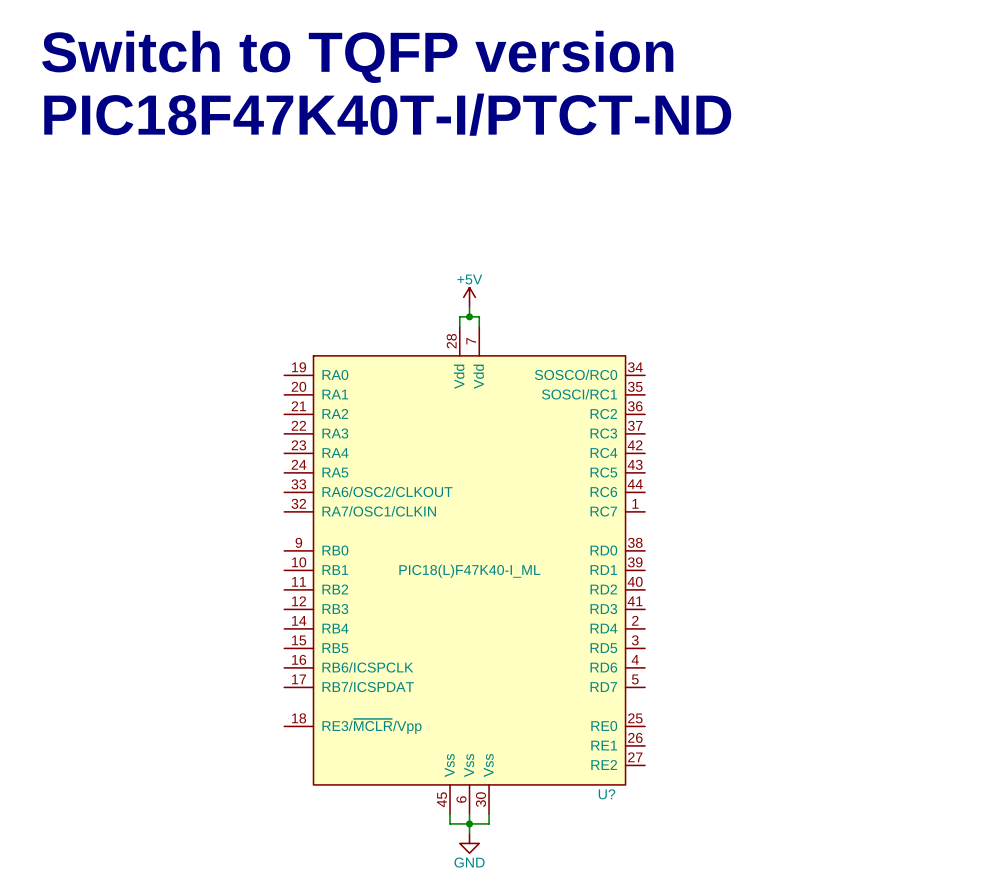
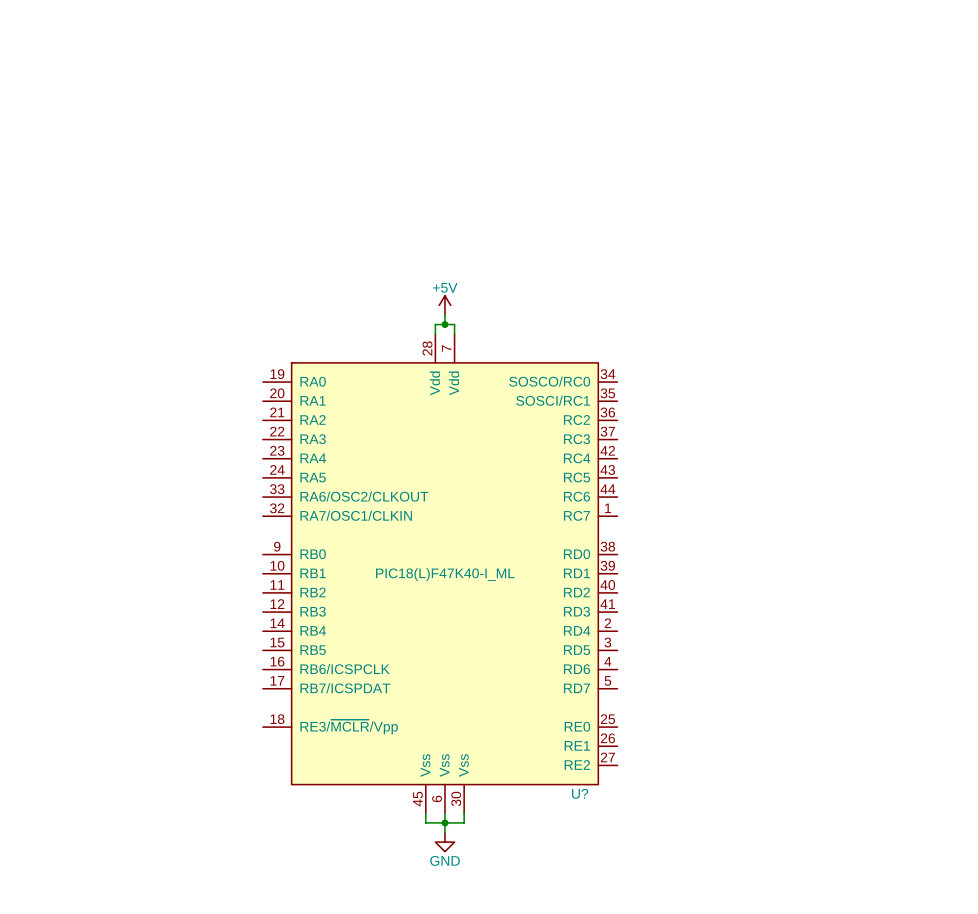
text: Switch to TQFP version (357, 56) -> none
text: PIC18F47K40T-I/PTCT-ND (387, 114) -> none

